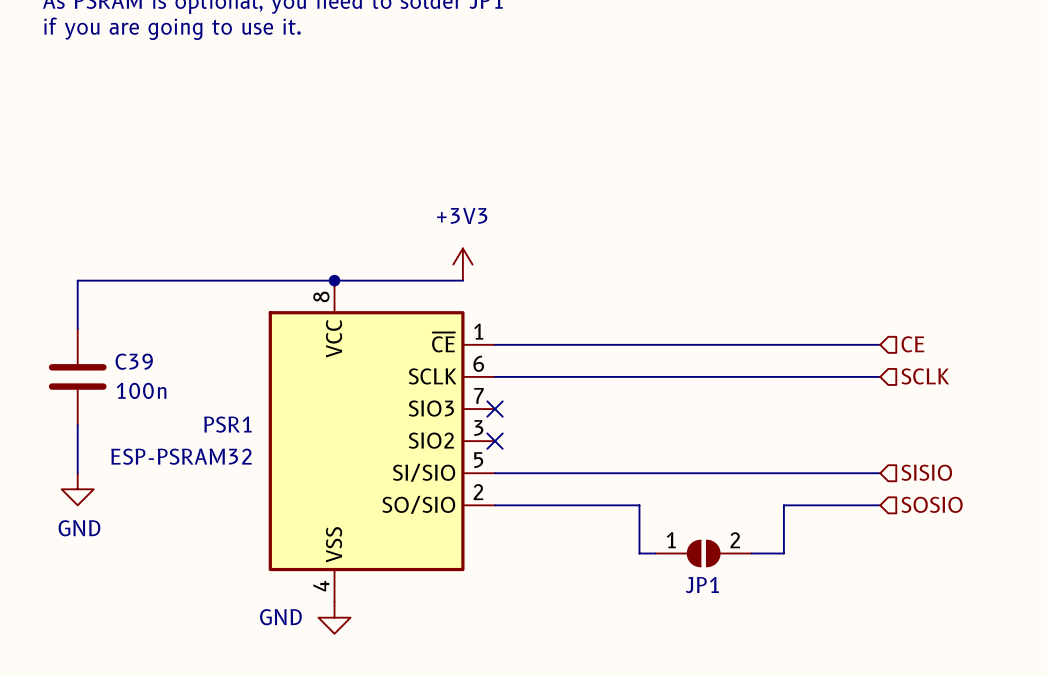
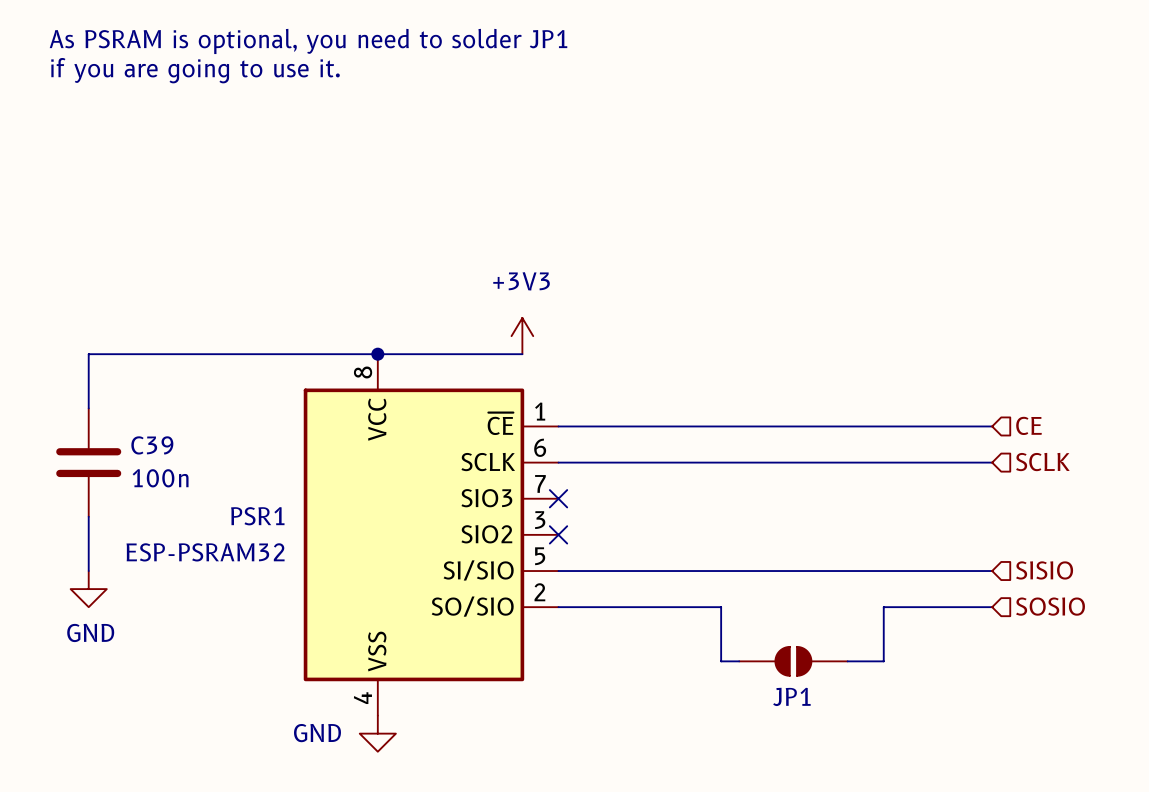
JP1 pin number: 1 (671, 540) -> none
JP1 pin number: 2 (735, 540) -> none

